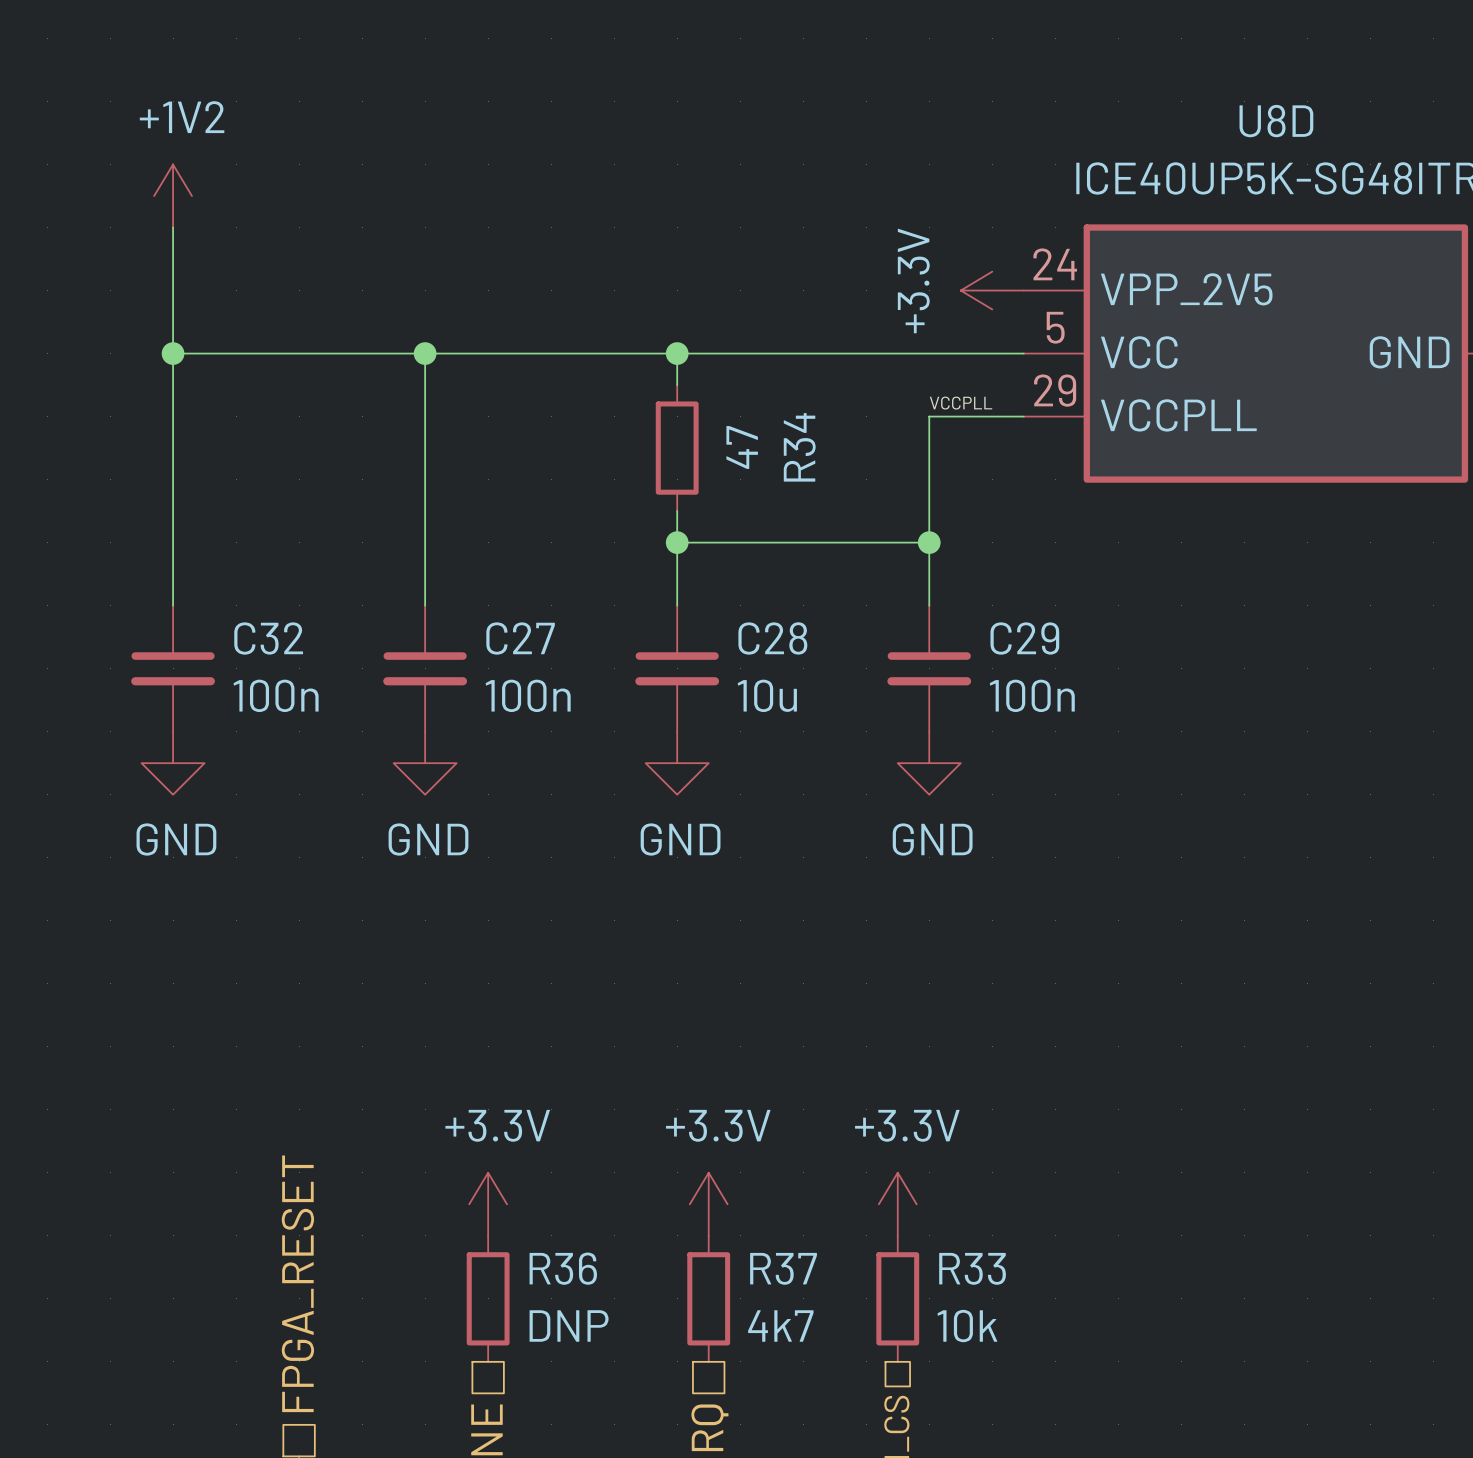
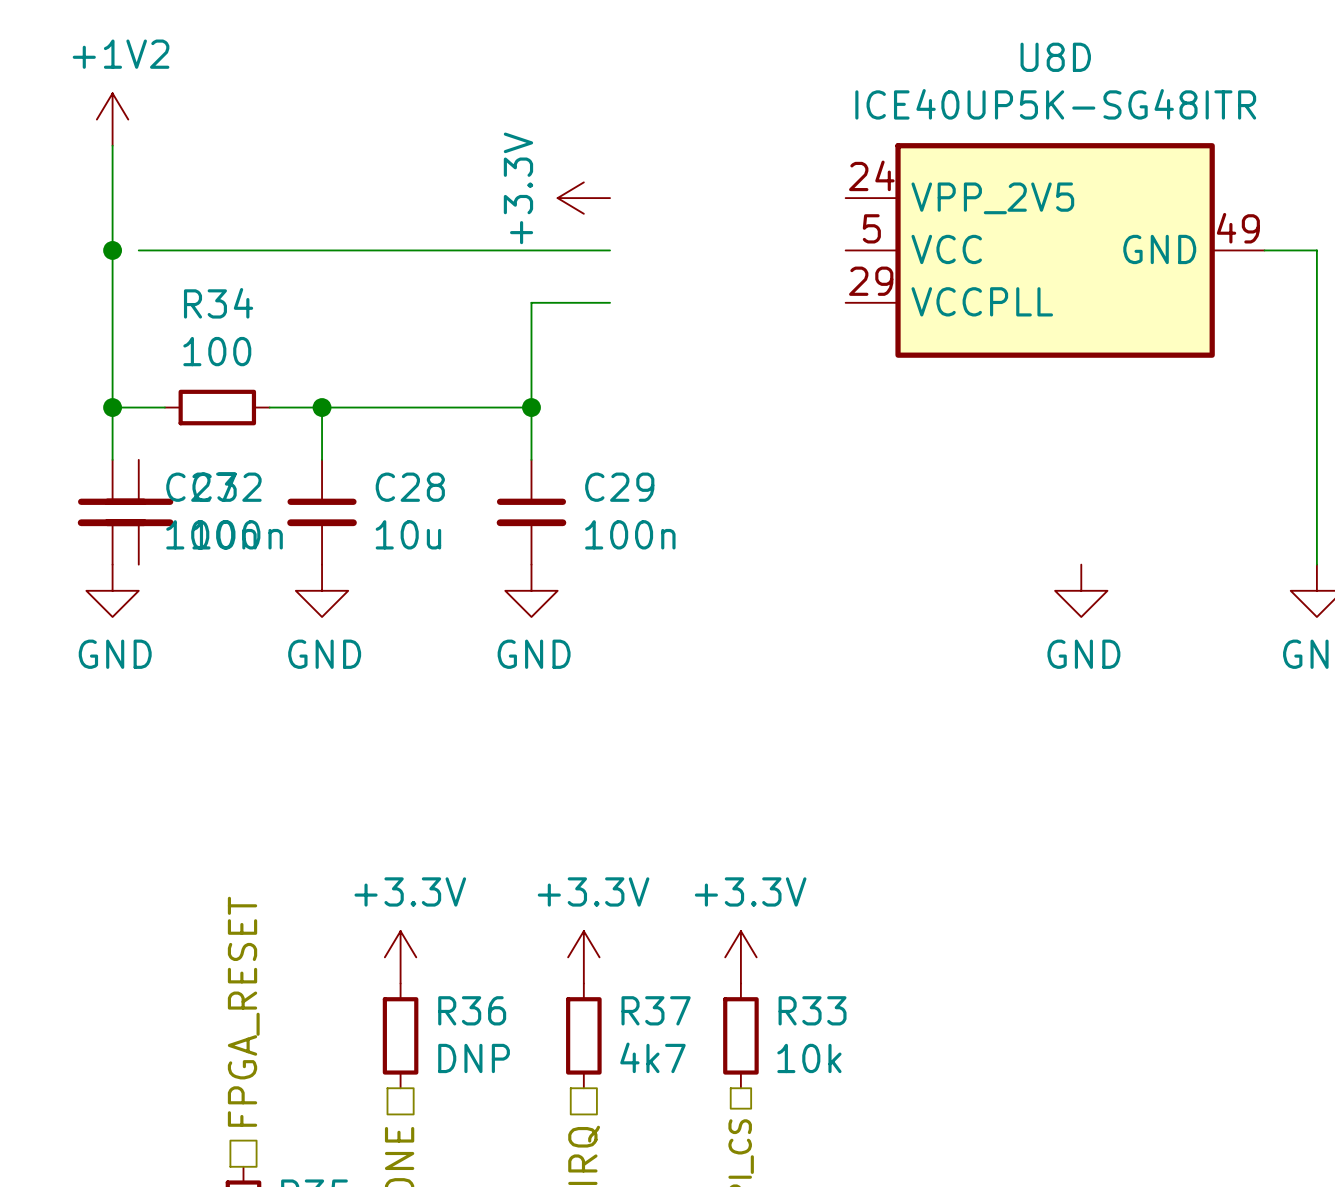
power symbol position: +1V2 (173, 196) -> +1V2 (112, 119)
wire: (173, 227) (173, 605) -> (112, 145) (112, 459)
power symbol position: +3.3V (992, 290) -> +3.3V (583, 198)
junction position: (173, 353) -> (112, 250)
wire: (425, 353) (425, 605) -> none
junction: (425, 353) -> none
wire: (677, 353) (677, 385) -> none
junction: (677, 353) -> none
wire: (740, 353) (1023, 353) -> none
label: VCCPLL (961, 403) -> none
wire: (1023, 416) (929, 416) (929, 605) -> (610, 302) (531, 302) (531, 459)
R34 value: 47 (742, 447) -> 100 (217, 351)
R34 name position: R34 (799, 447) -> R34 (218, 303)
R34 rotation: 0° (677, 448) -> 90° clockwise (217, 407)
R34 position: (677, 448) -> (217, 407)
wire: (677, 511) (677, 605) -> none
wire: none -> (112, 407) (164, 407)
junction: none -> (112, 407)
wire: none -> (269, 407) (531, 407)
wire: none -> (322, 407) (322, 459)
junction: none -> (322, 407)
wire: (677, 542) (929, 542) -> none
junction position: (677, 542) -> (531, 407)
junction: (929, 542) -> none
C27 position: (425, 668) -> (112, 512)
C28 position: (677, 668) -> (322, 512)
C29 position: (929, 668) -> (531, 512)
power symbol position: GND (173, 763) -> GND (112, 590)
power symbol position: GND (425, 763) -> GND (322, 590)
power symbol position: GND (677, 763) -> GND (531, 590)
power symbol: GND (929, 763) -> none
power symbol: none -> GND (1081, 590)

